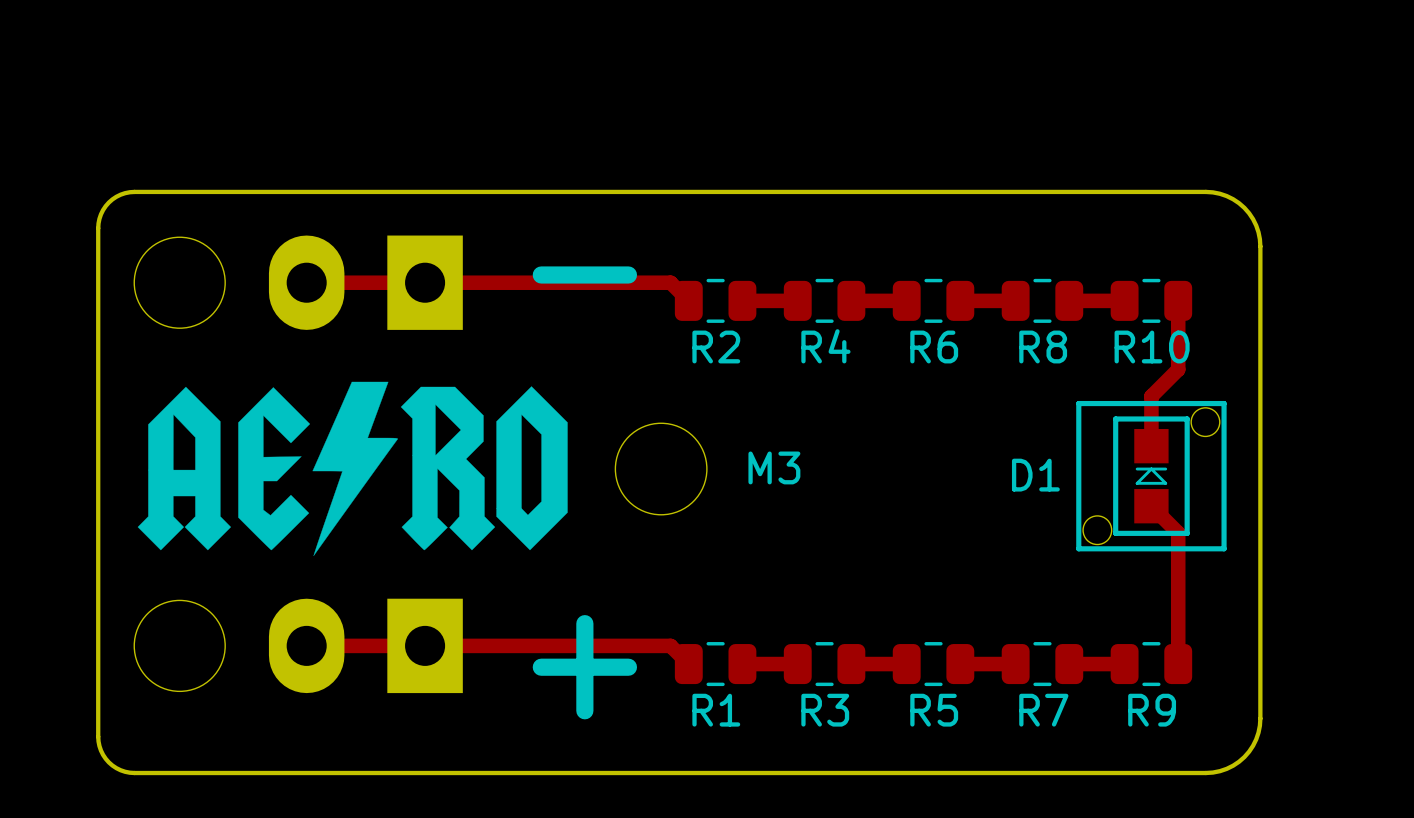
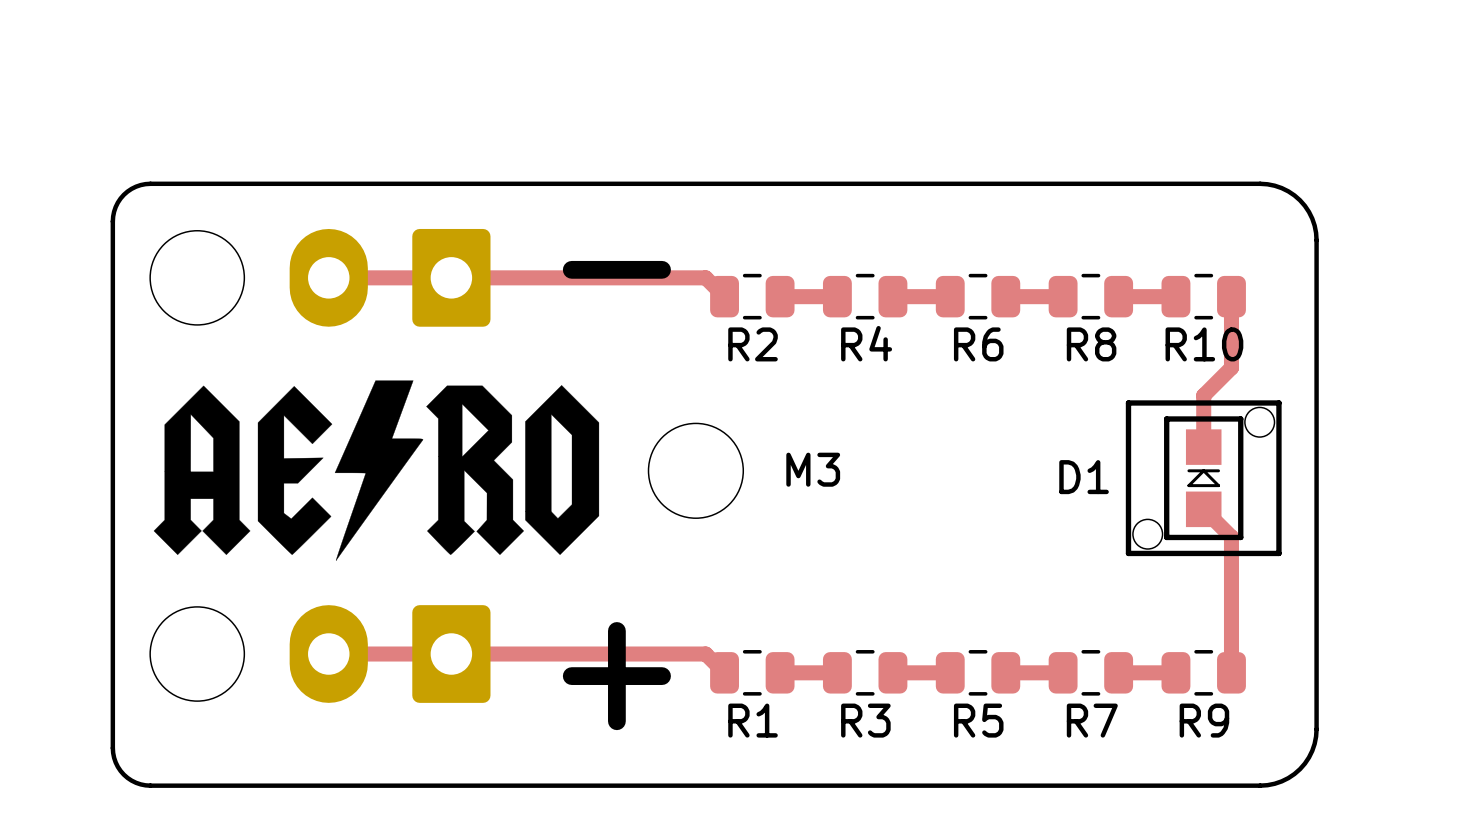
part footprint: [134, 235, 463, 330] -> [150, 228, 491, 327]
part footprint: [134, 598, 463, 694] -> [150, 605, 491, 703]

